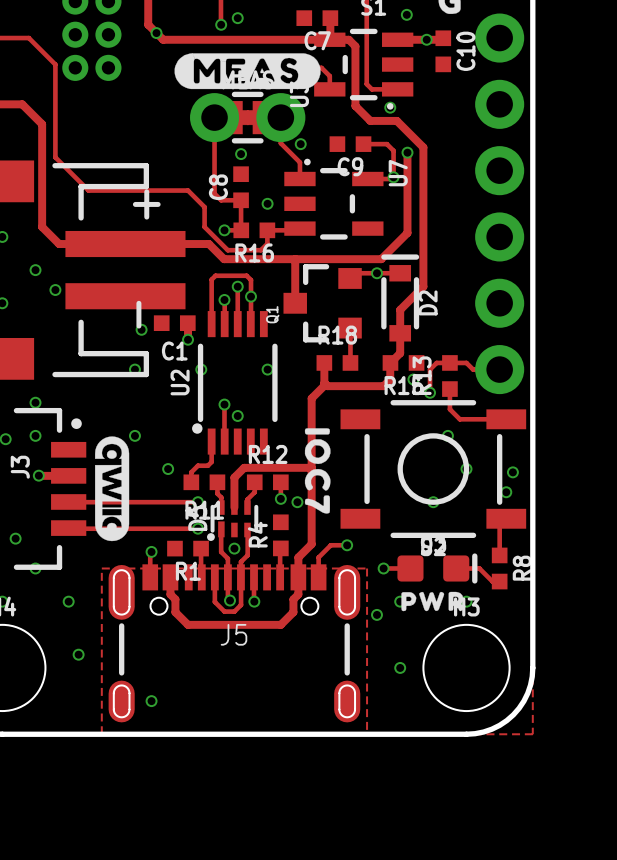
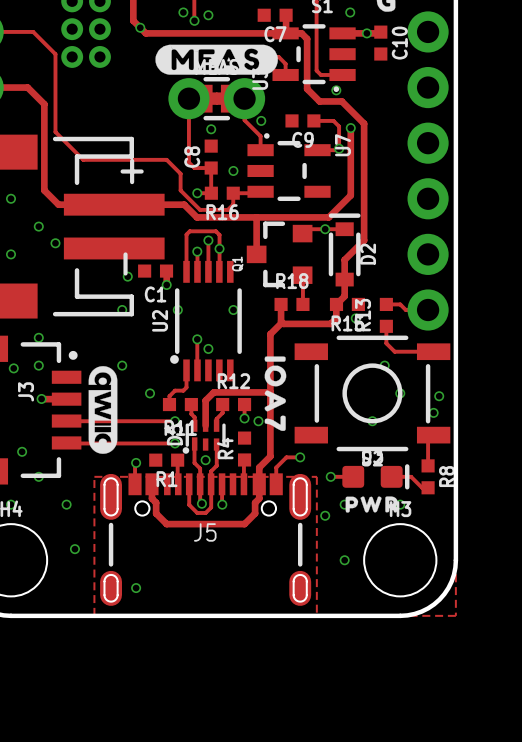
via: none -> (183, 12)
track: (449, 362) (436, 362) (430, 369) (430, 392) -> none
via: (430, 392) -> none
drawing shape: [304, 428, 331, 514] -> [264, 356, 287, 431]

